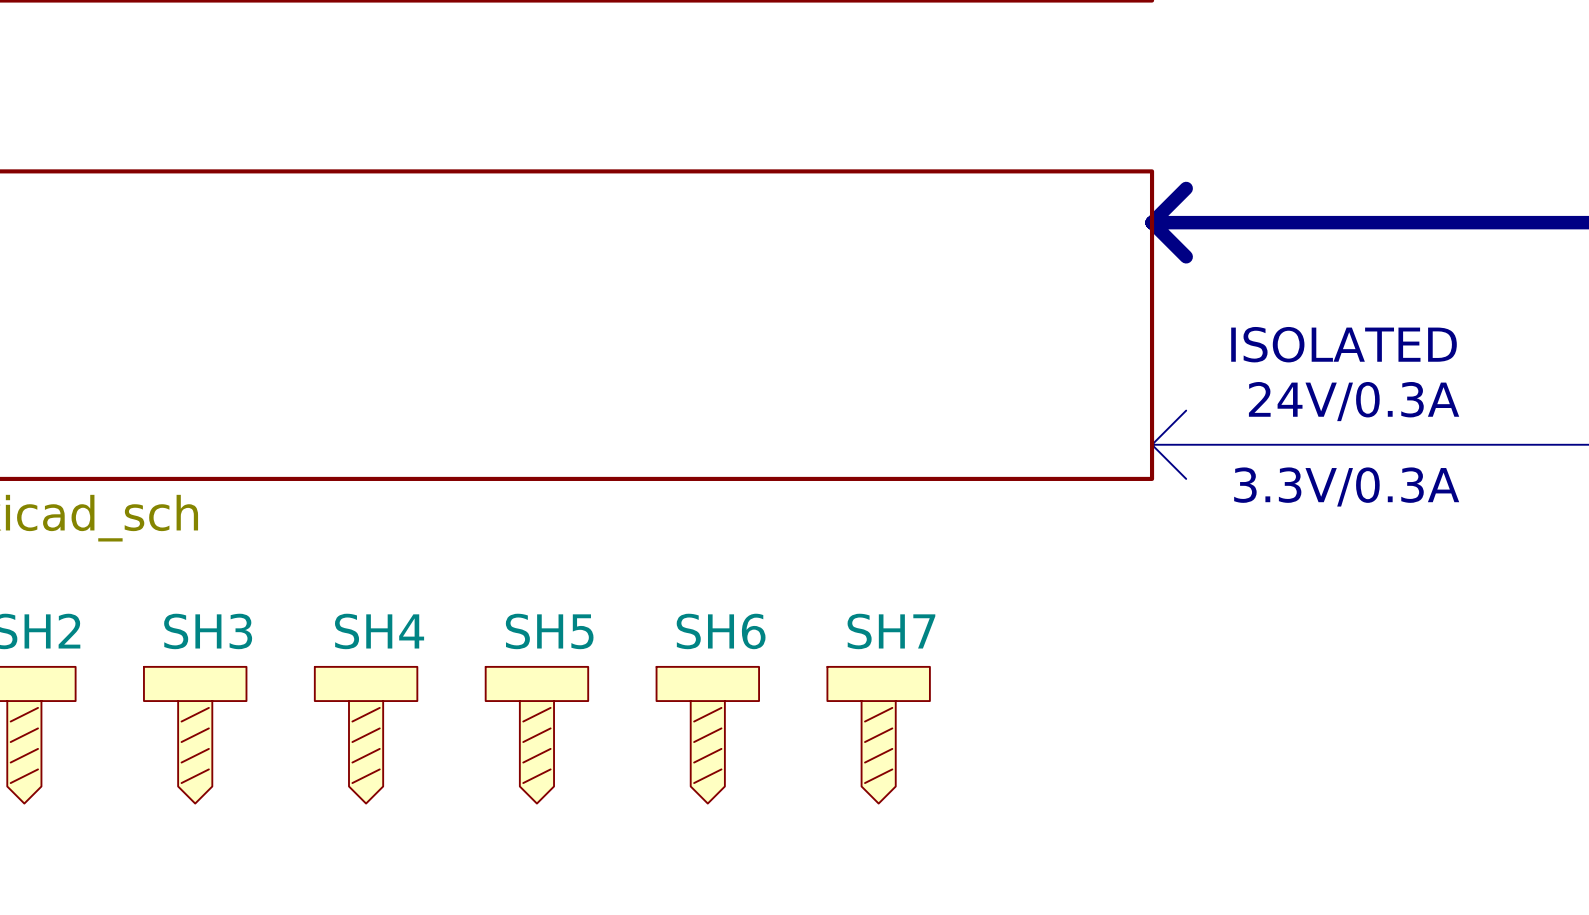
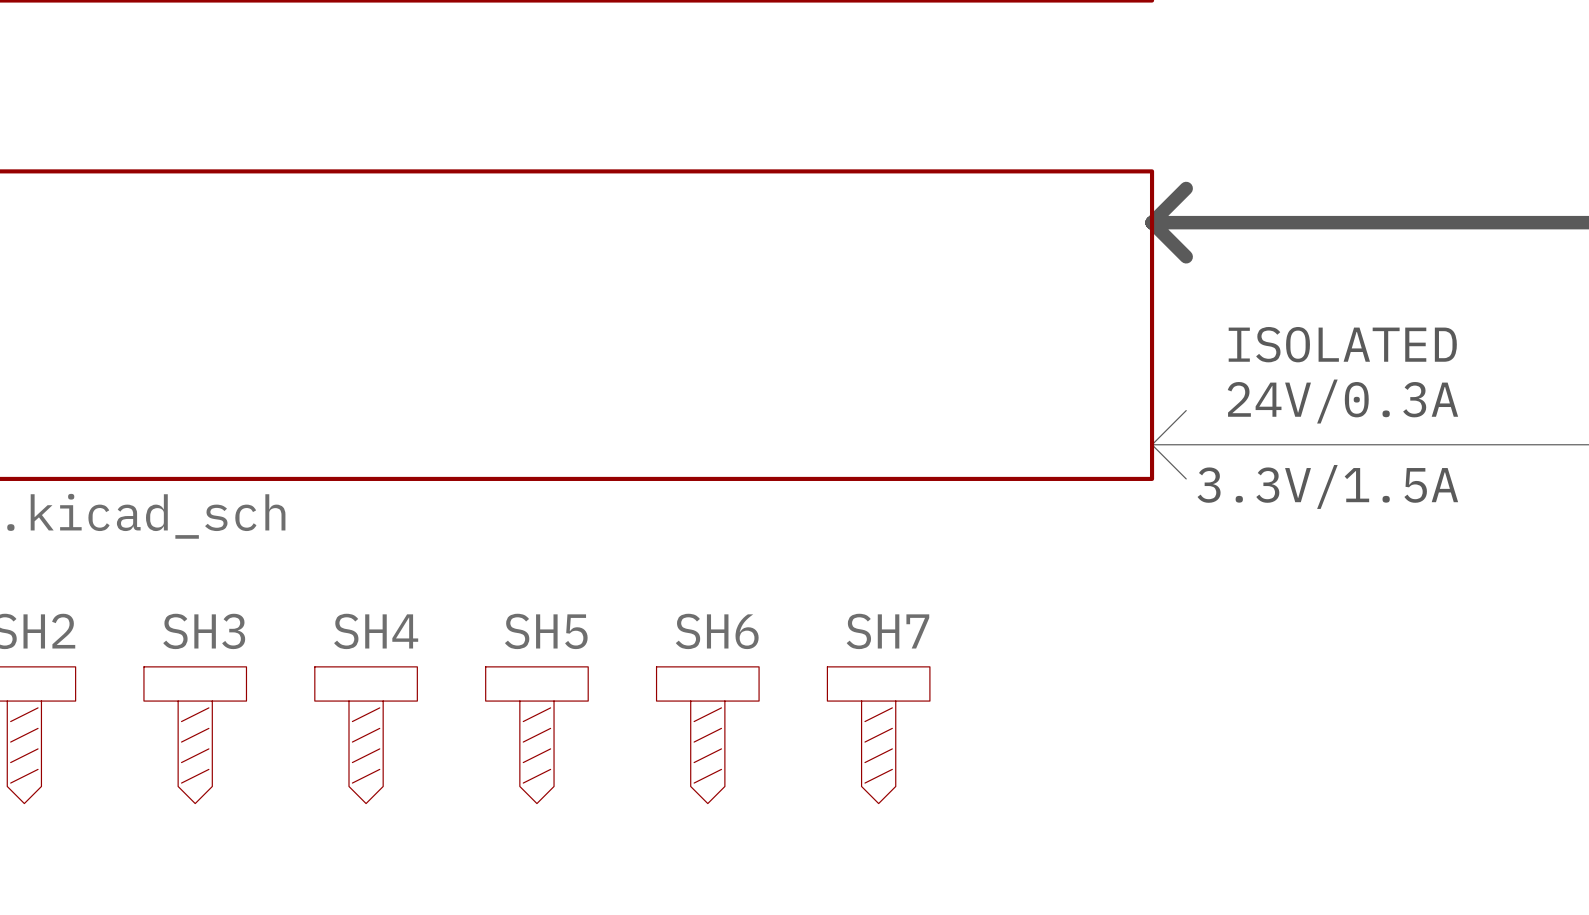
text: 3.3V/0.3A (1346, 486) -> 3.3V/1.5A (1327, 486)

